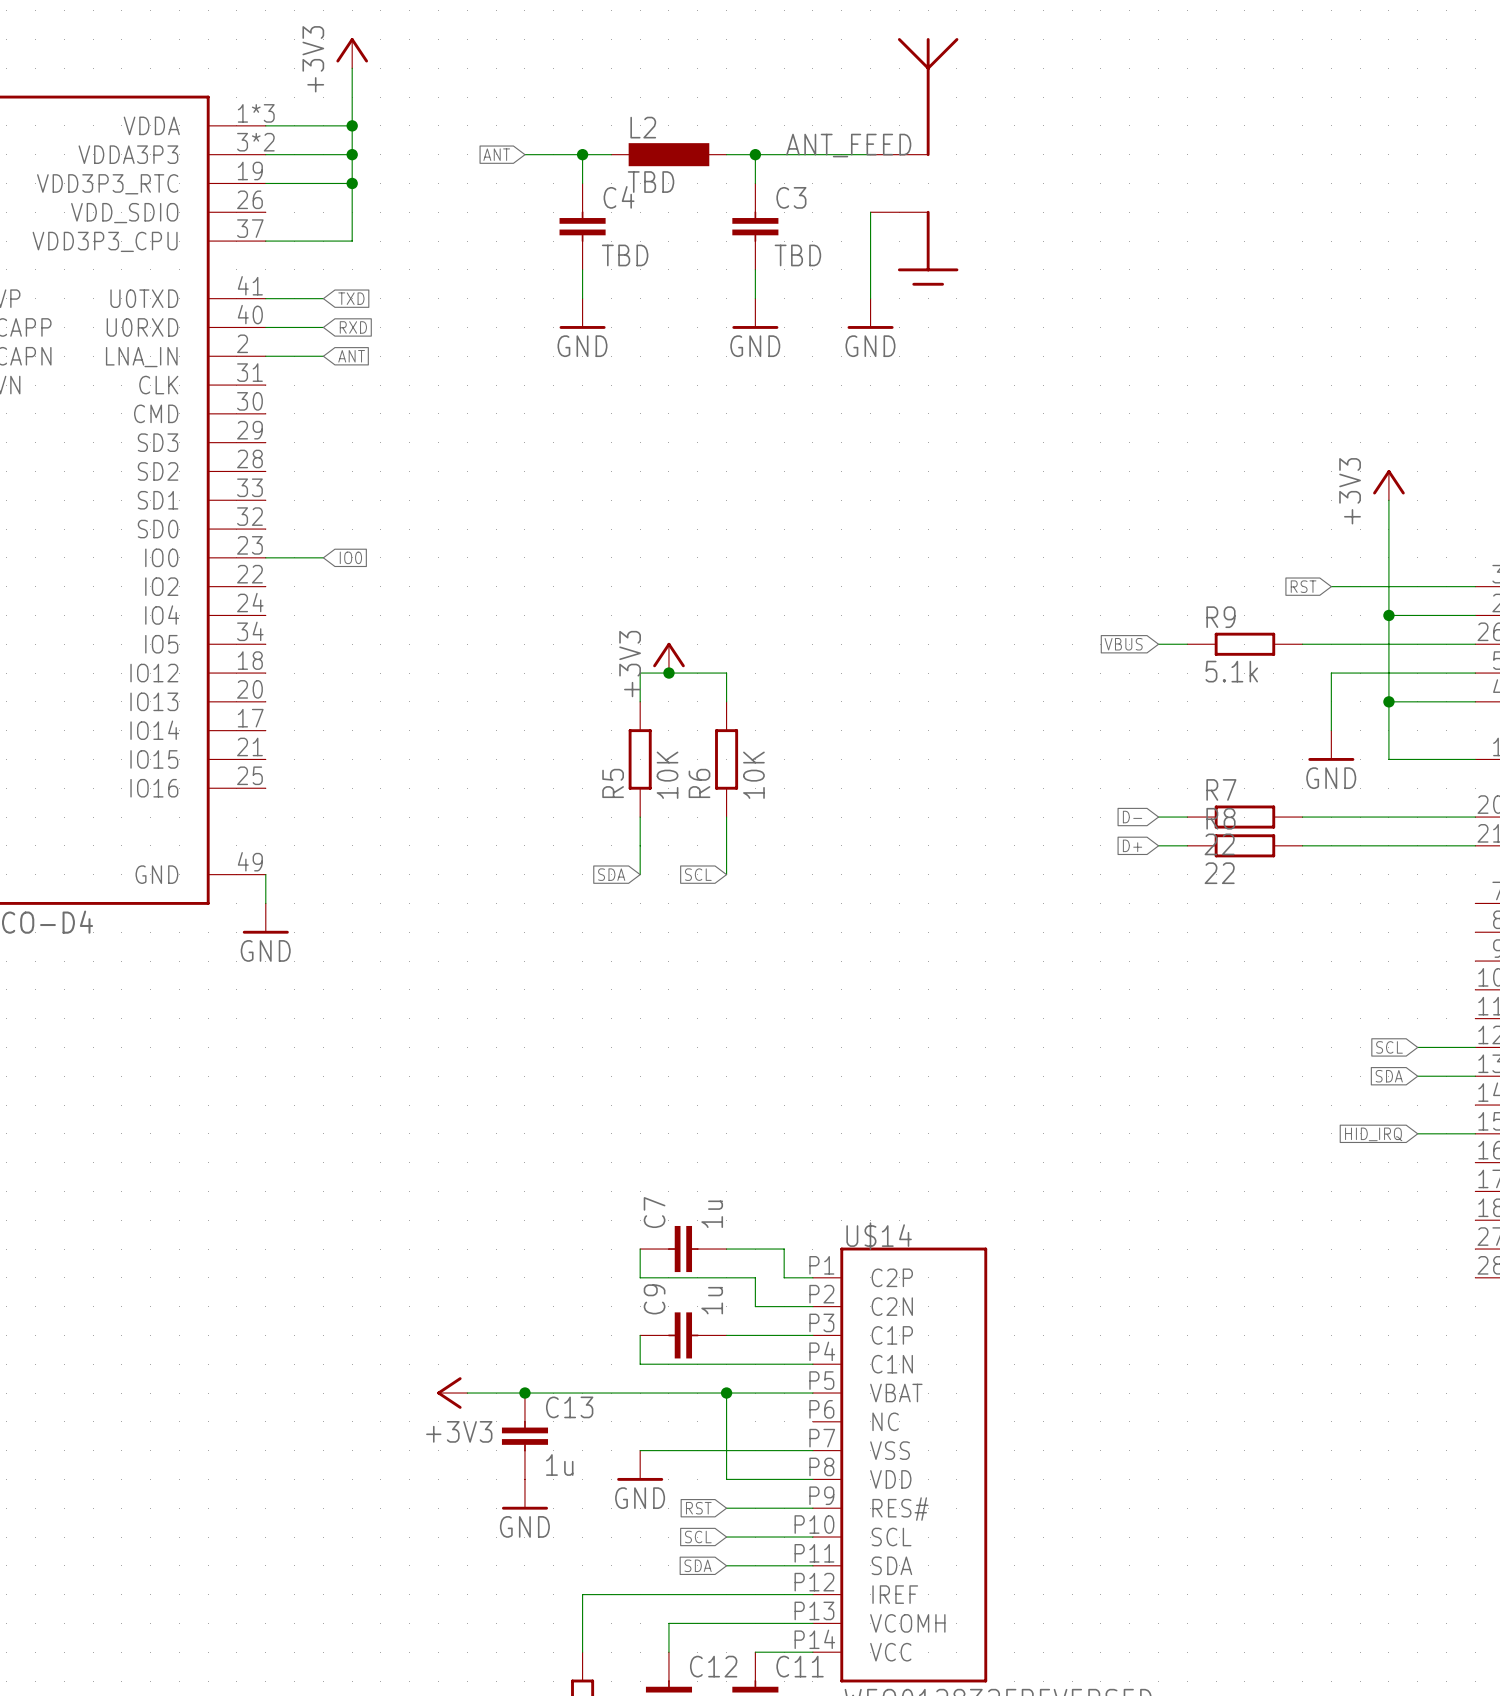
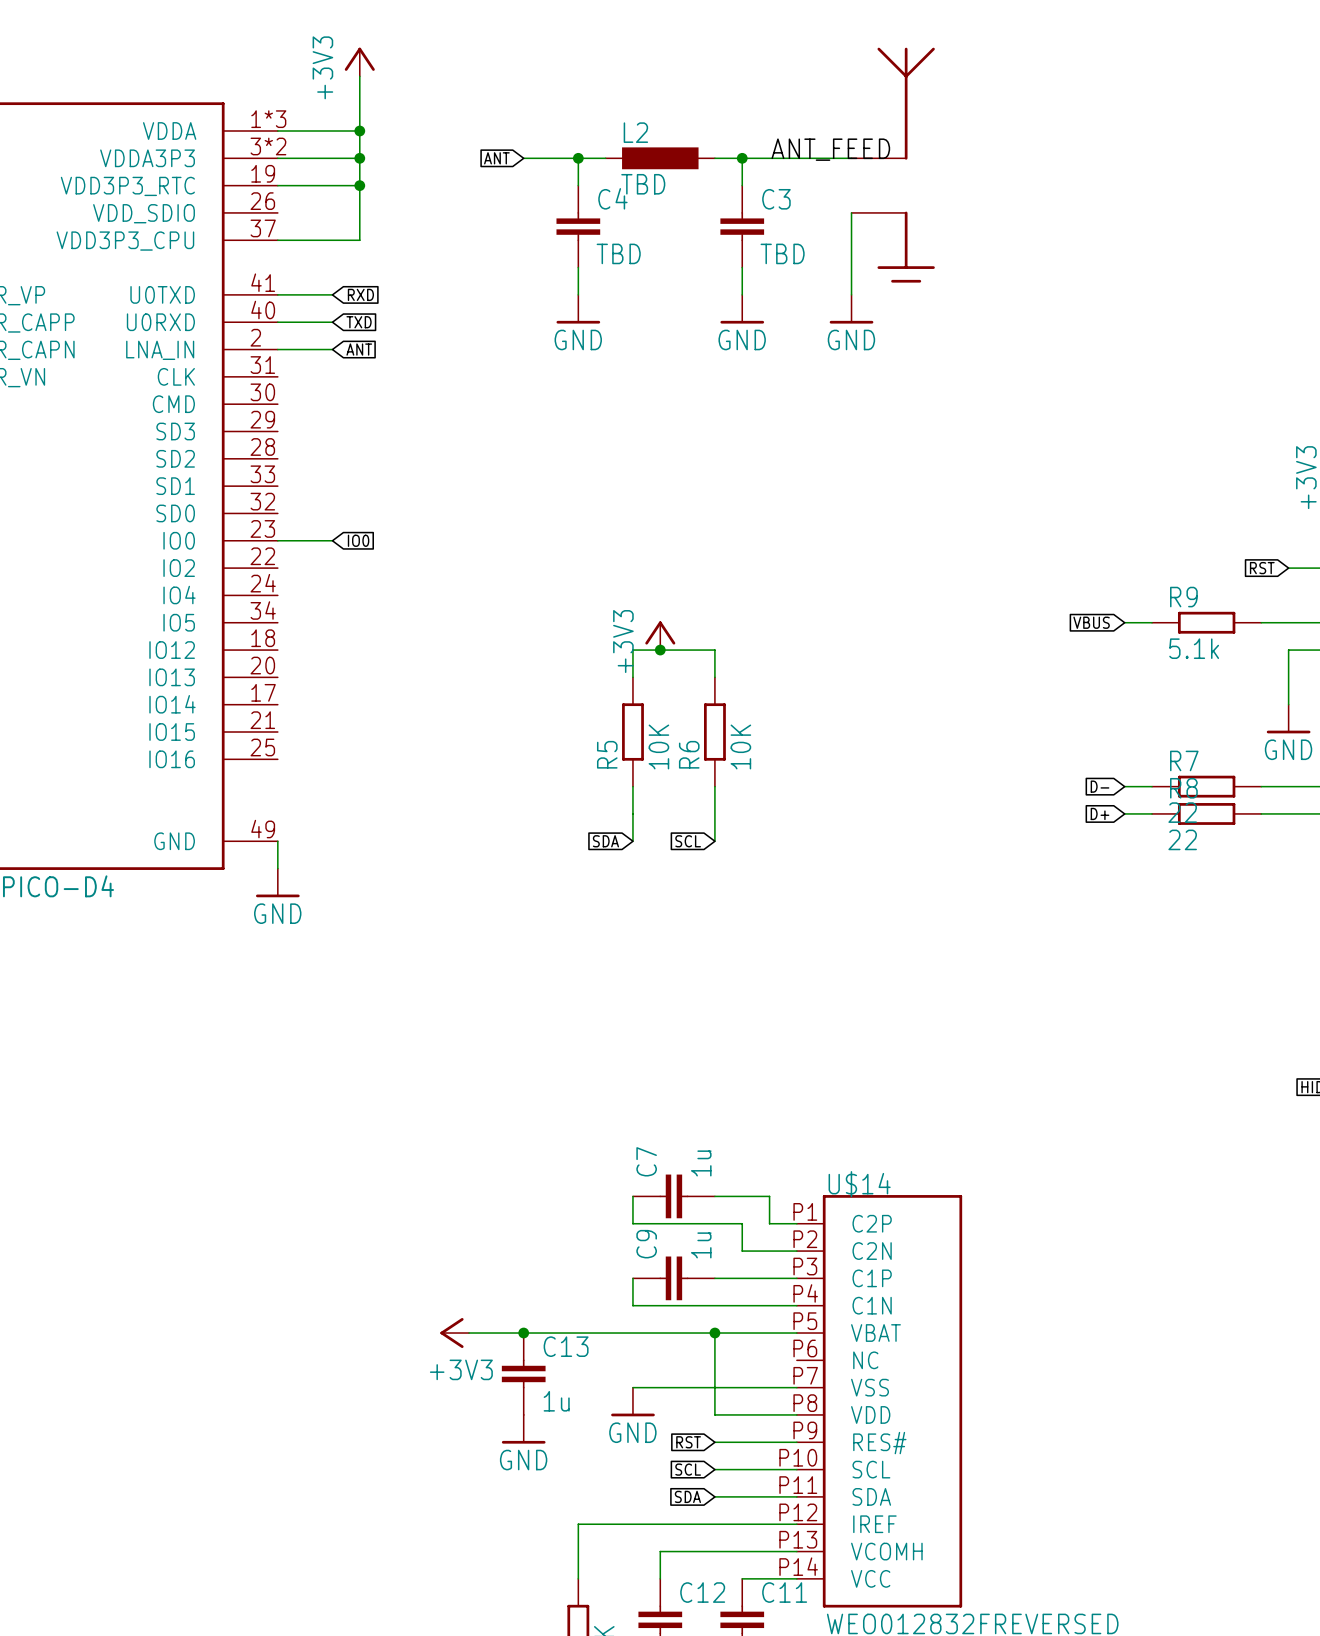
global label: TXD (351, 298) -> RXD (360, 294)
global label: RXD (353, 327) -> TXD (359, 322)

